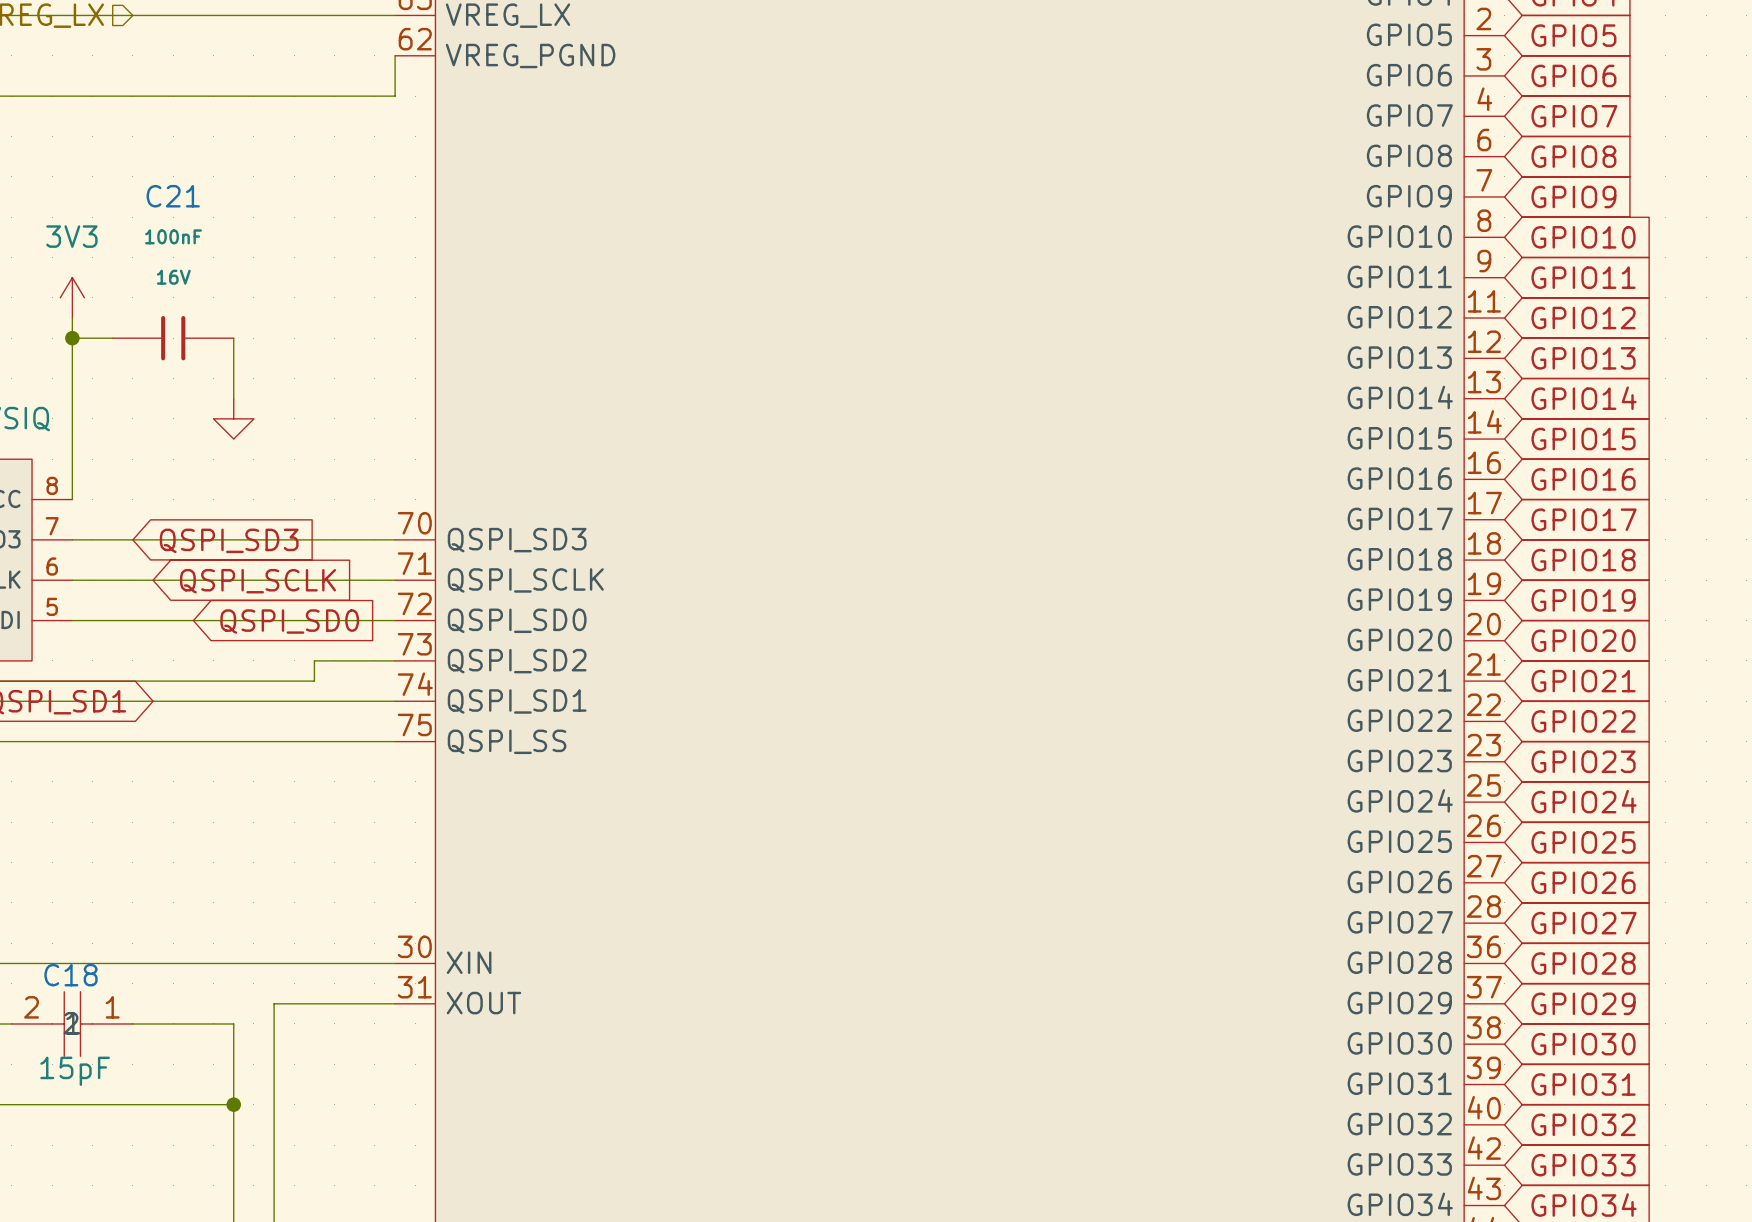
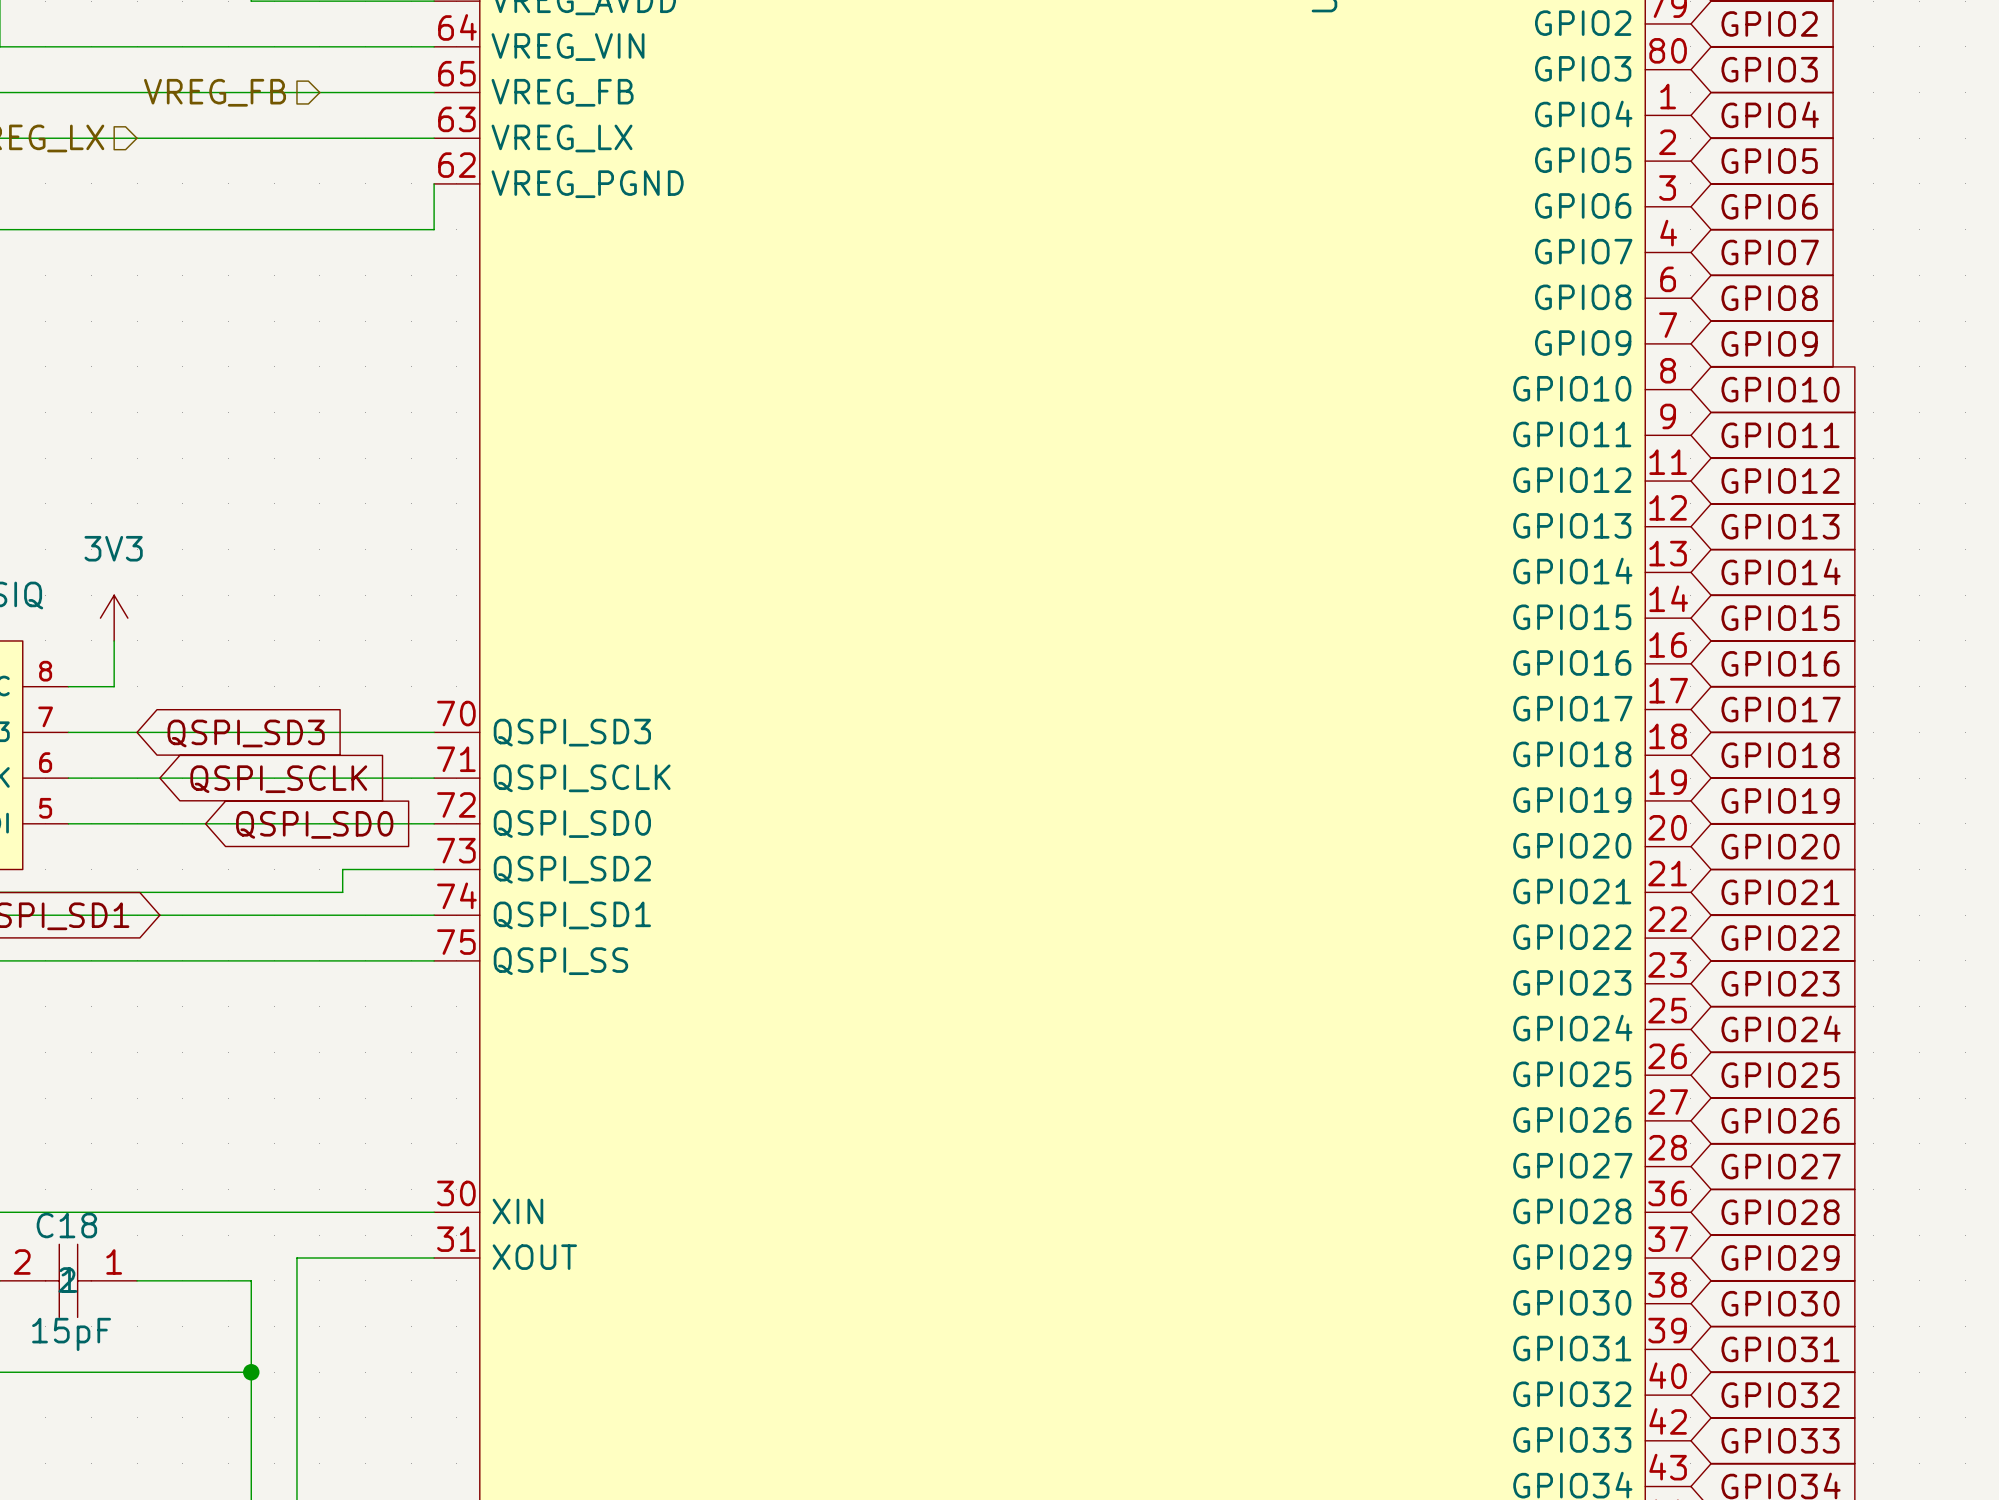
power symbol position: 3V3 (72, 297) -> 3V3 (114, 618)
wire: (72, 318) (72, 499) -> (114, 640) (114, 686) (68, 686)
wire: (72, 338) (112, 338) -> none
junction: (72, 338) -> none
C21: 100nF (173, 338) -> none
wire: (233, 338) (233, 398) -> none
power symbol: (233, 418) -> none

